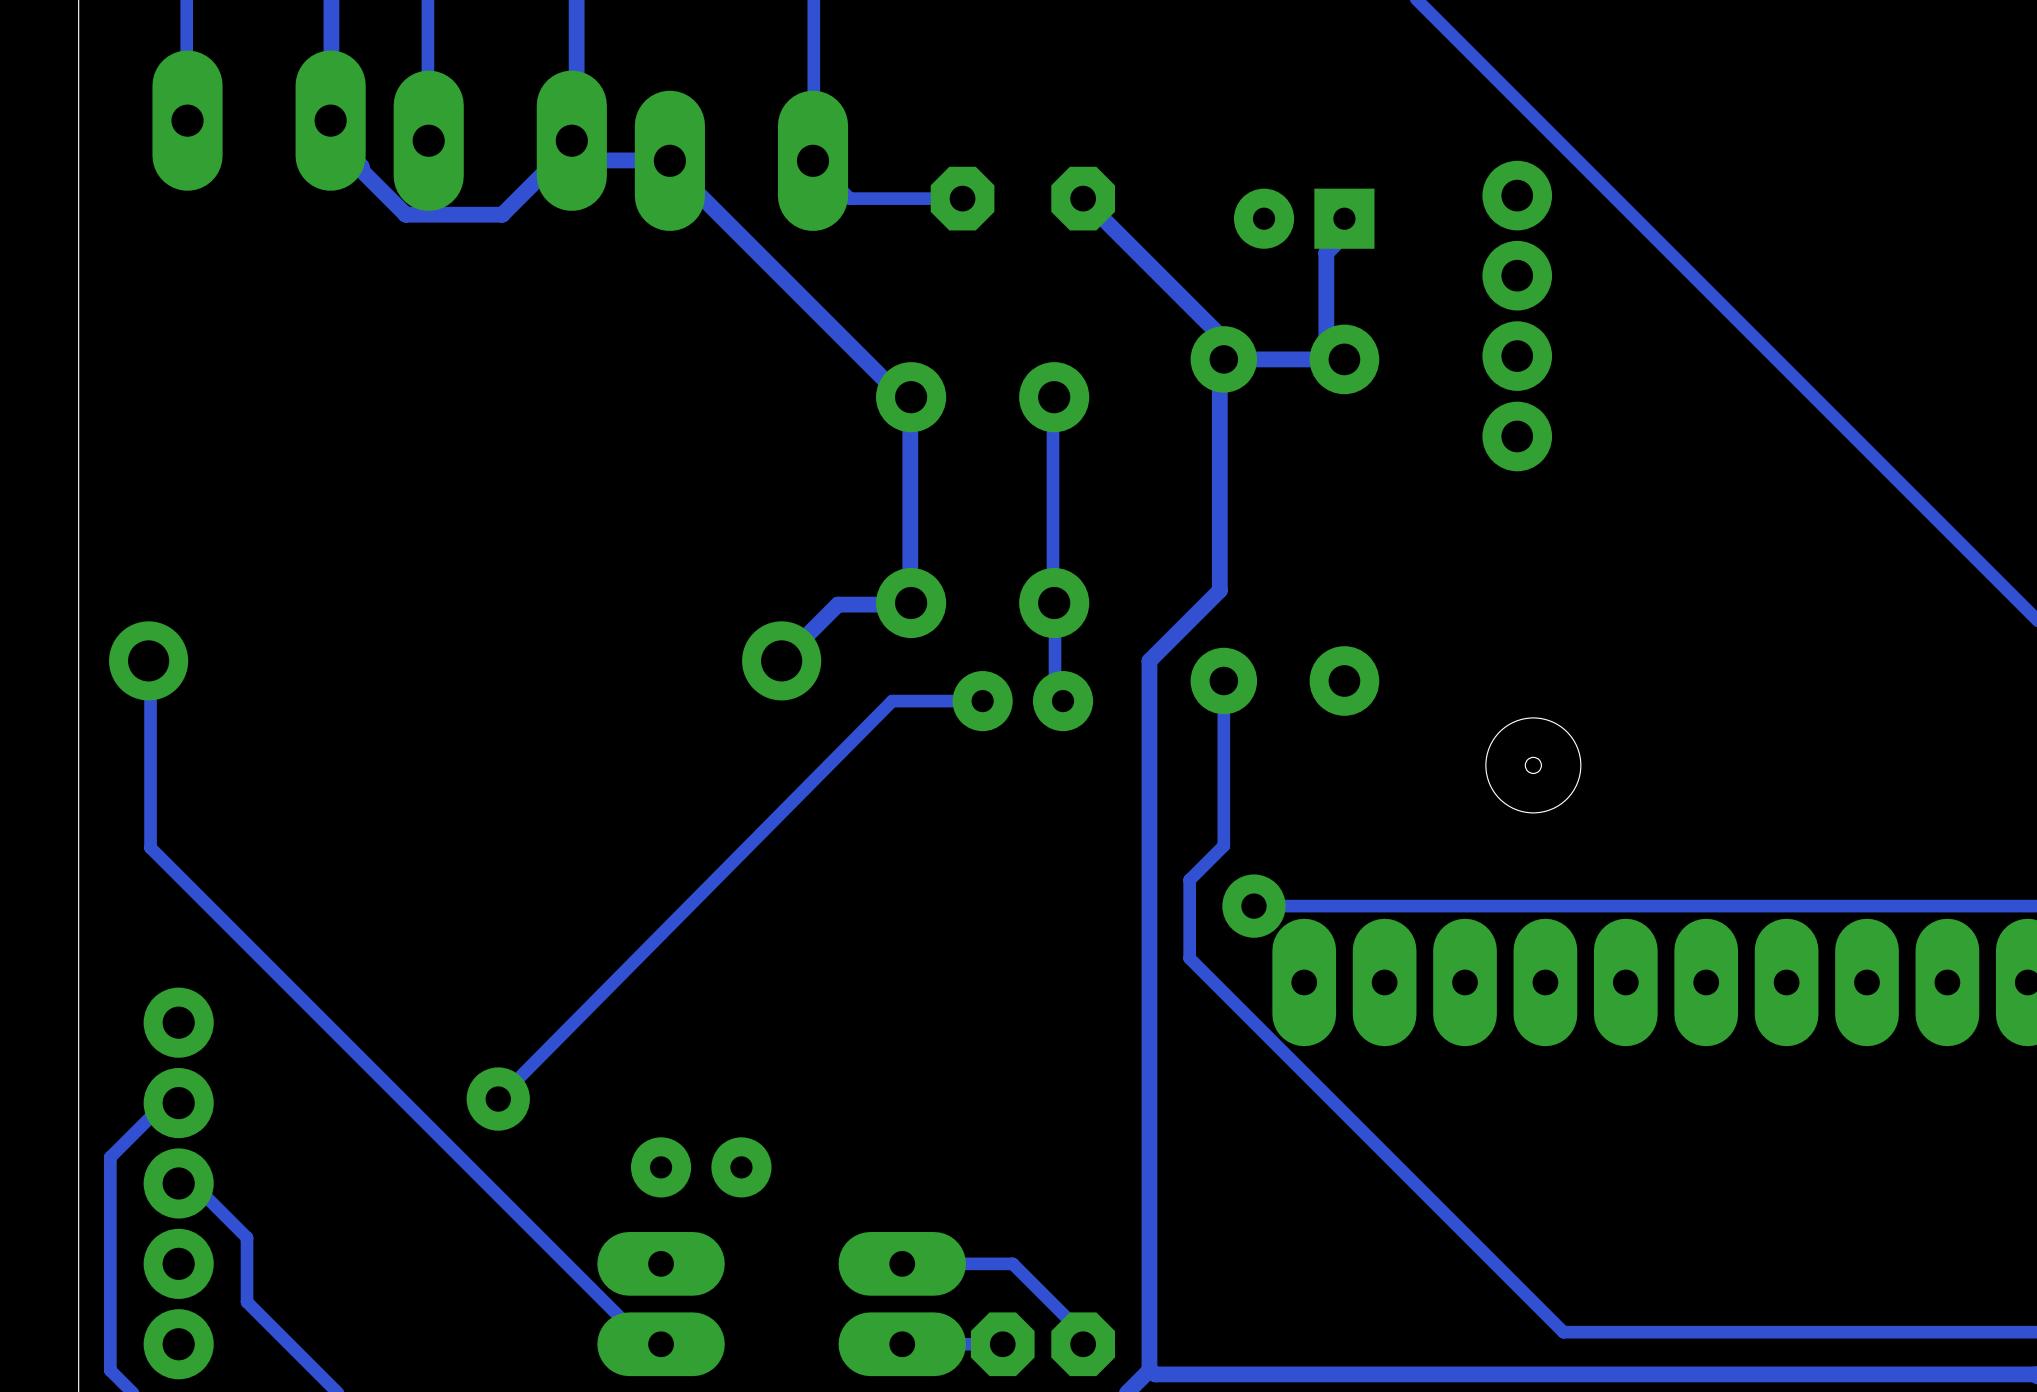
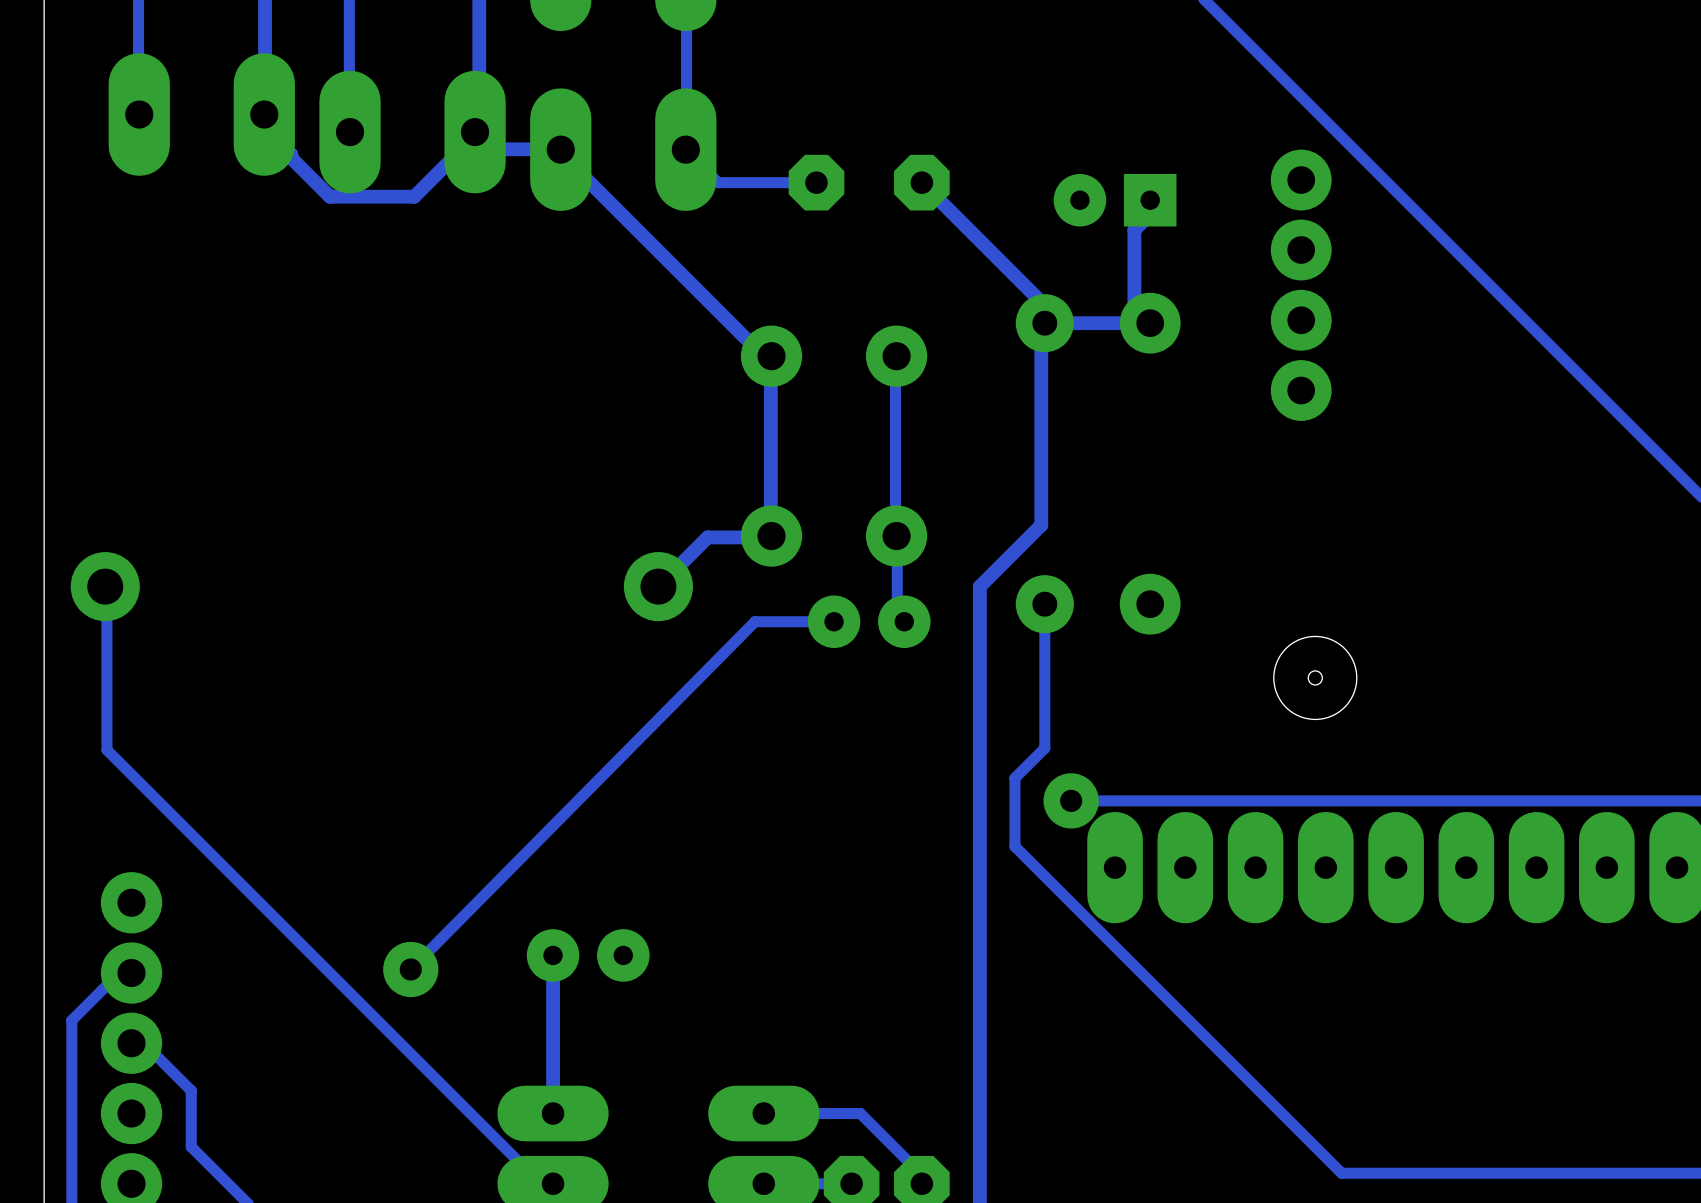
track: none -> (553, 955) (553, 1113)
part position: (701, 1167) -> (588, 955)

